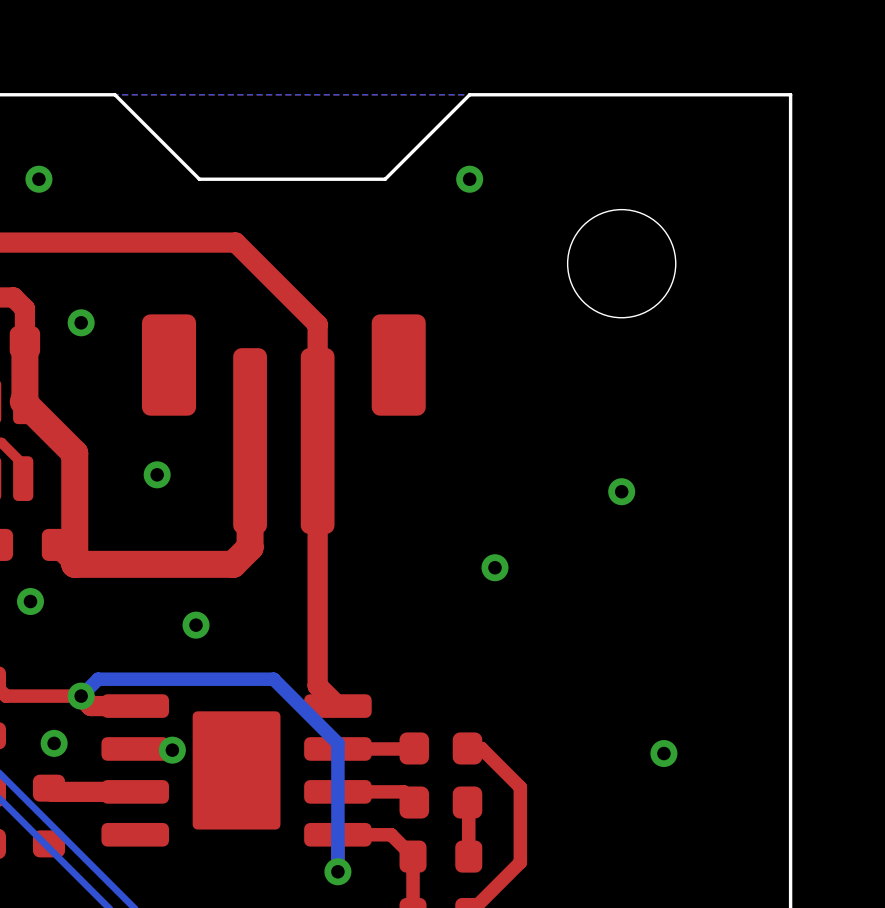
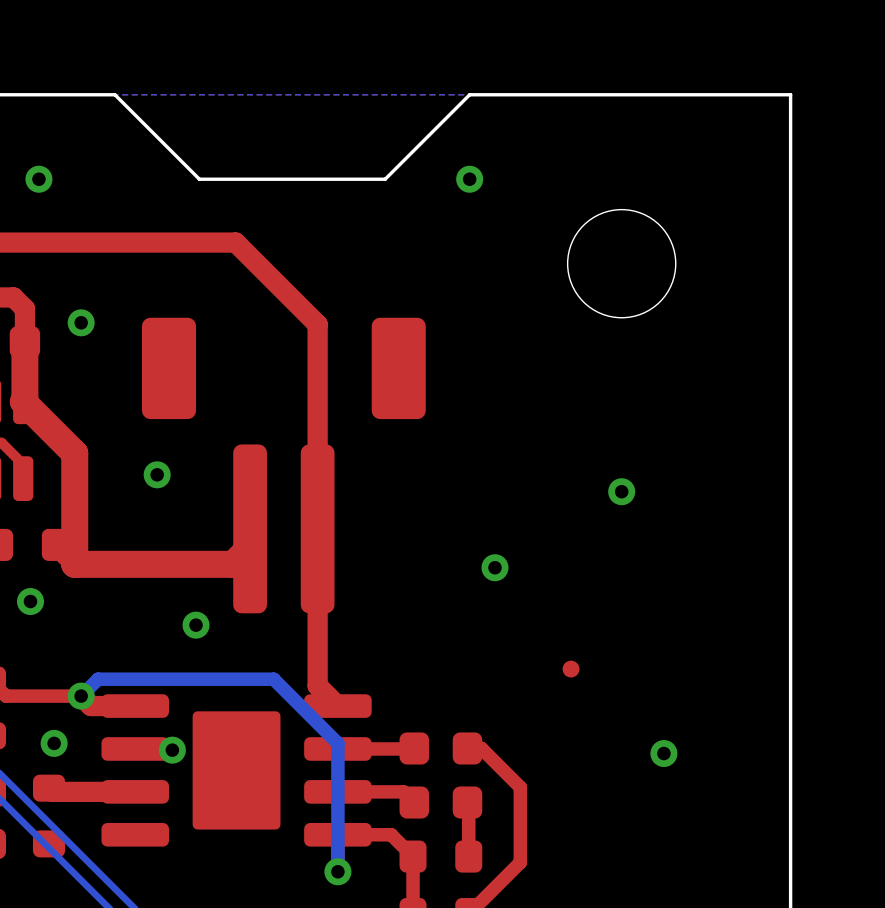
part: (283, 424) -> none
part: none -> (283, 465)
part: none -> (571, 669)

